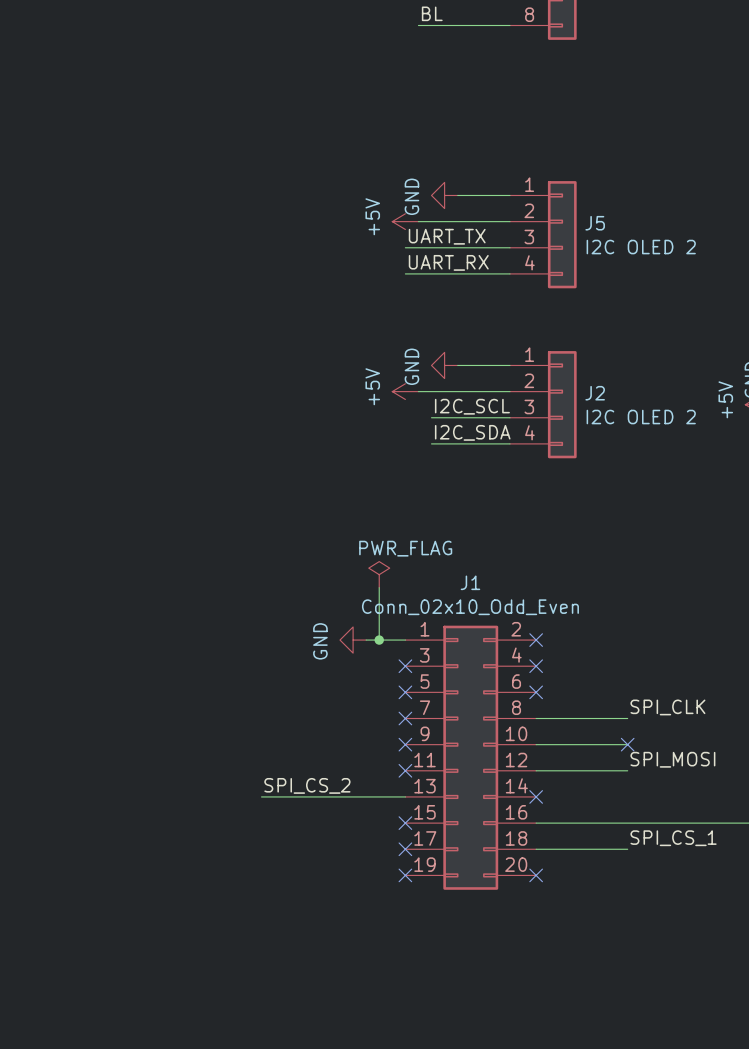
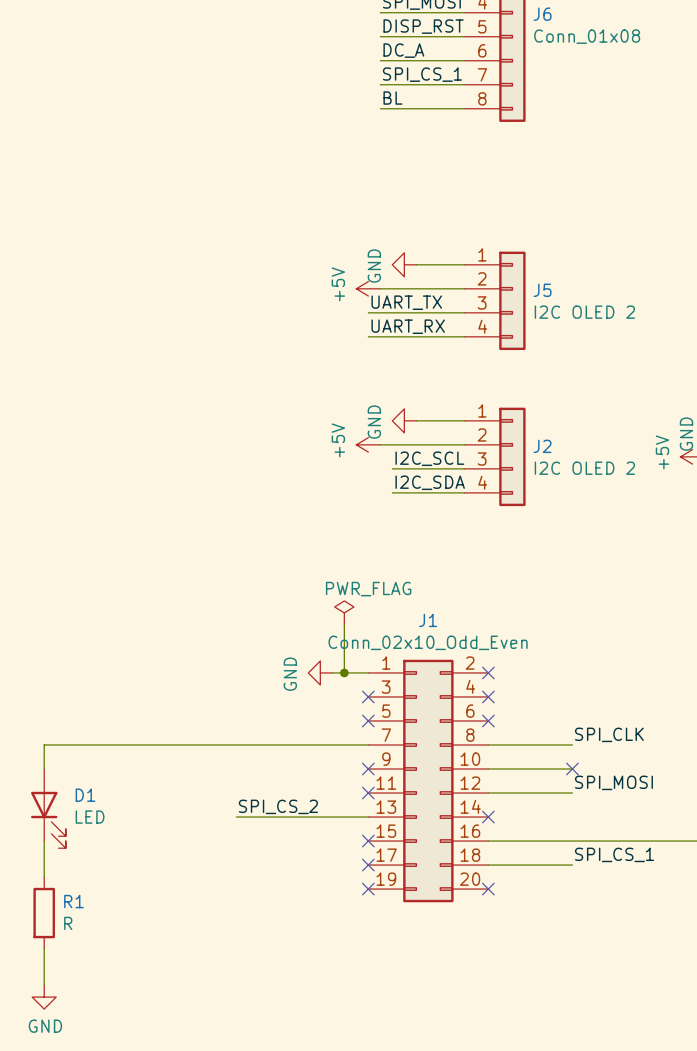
wire: none -> (368, 745) (44, 745) (44, 769)
no-connect mark: (405, 718) -> none
D1: none -> LED (48, 808)
wire: none -> (44, 841) (44, 877)
R1: none -> R (44, 913)
wire: none -> (44, 949) (44, 985)
power symbol: none -> GND (44, 997)

